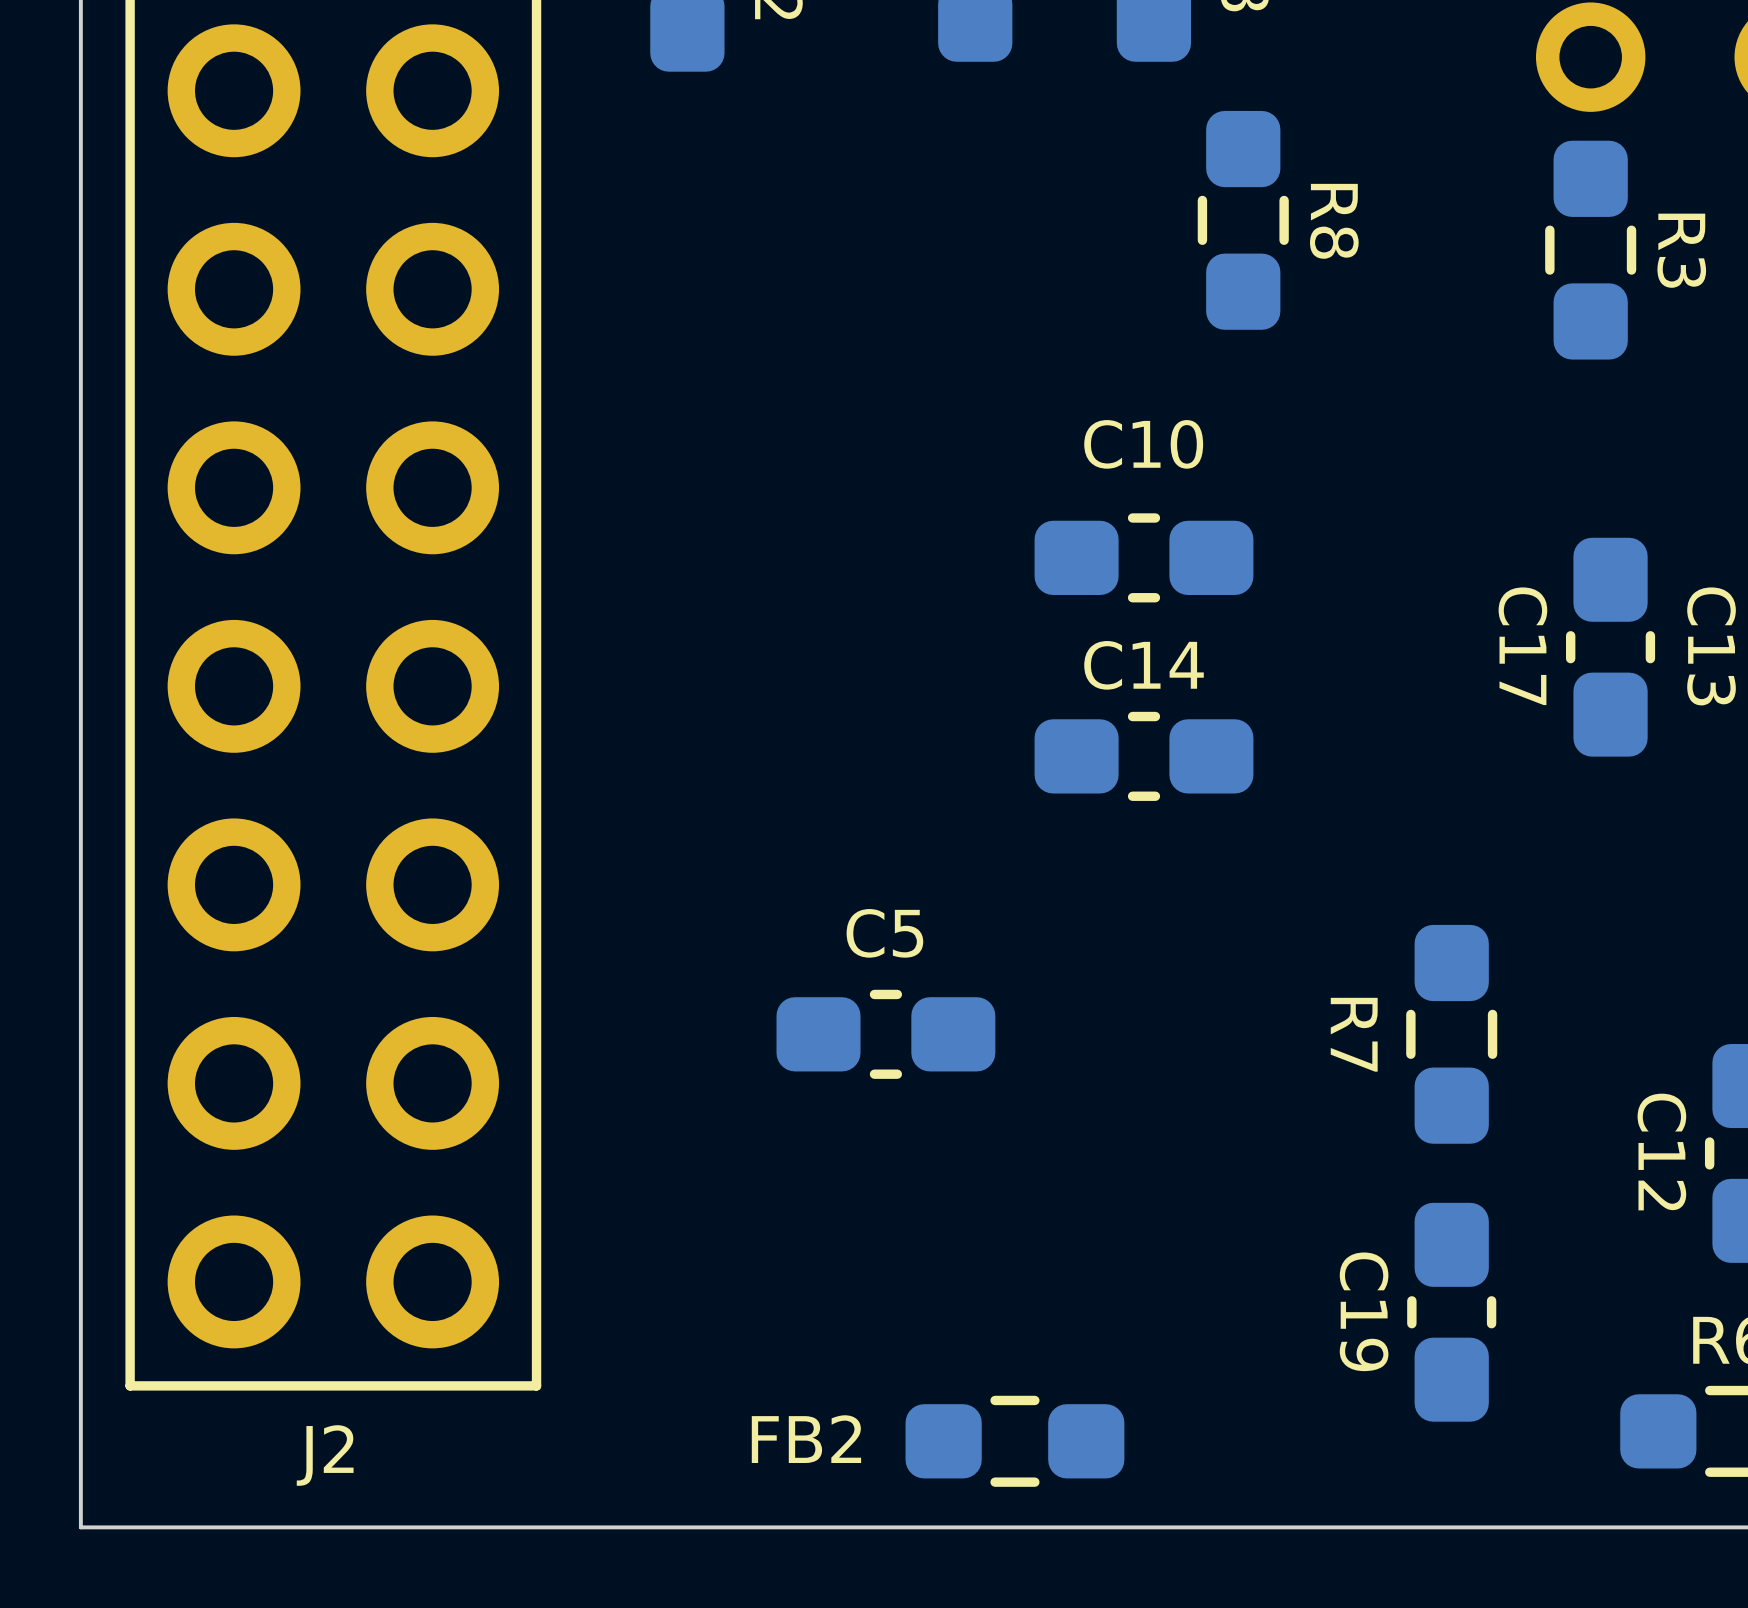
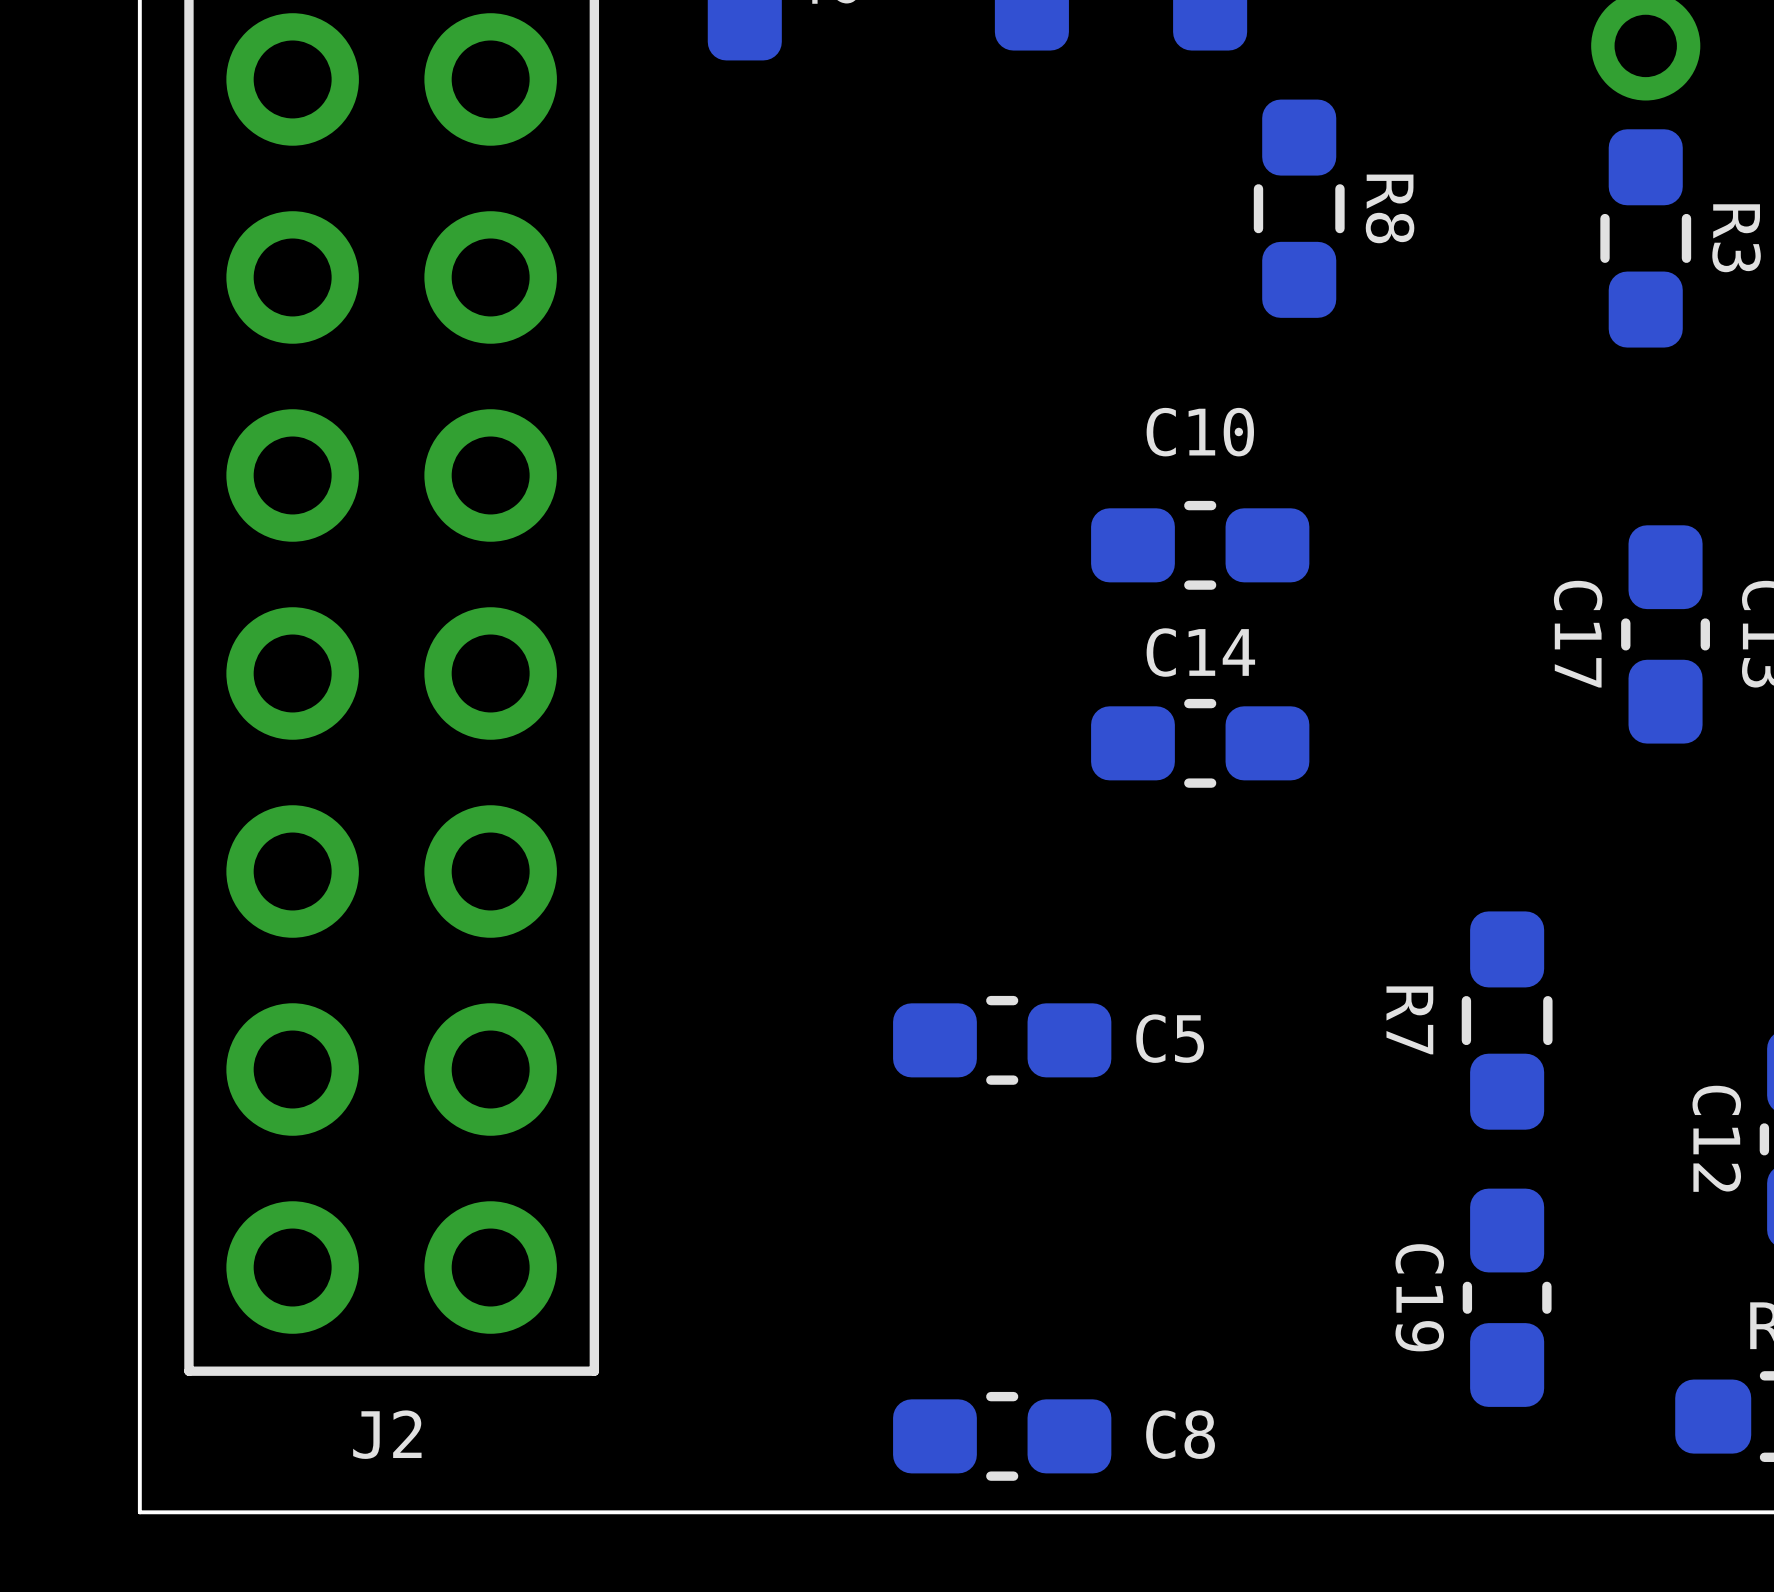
C5 name position: C5 (884, 933) -> C5 (1170, 1038)
C5 position: (885, 1034) -> (1002, 1040)
FB2: (1014, 1441) -> none
C8: none -> (1002, 1436)

